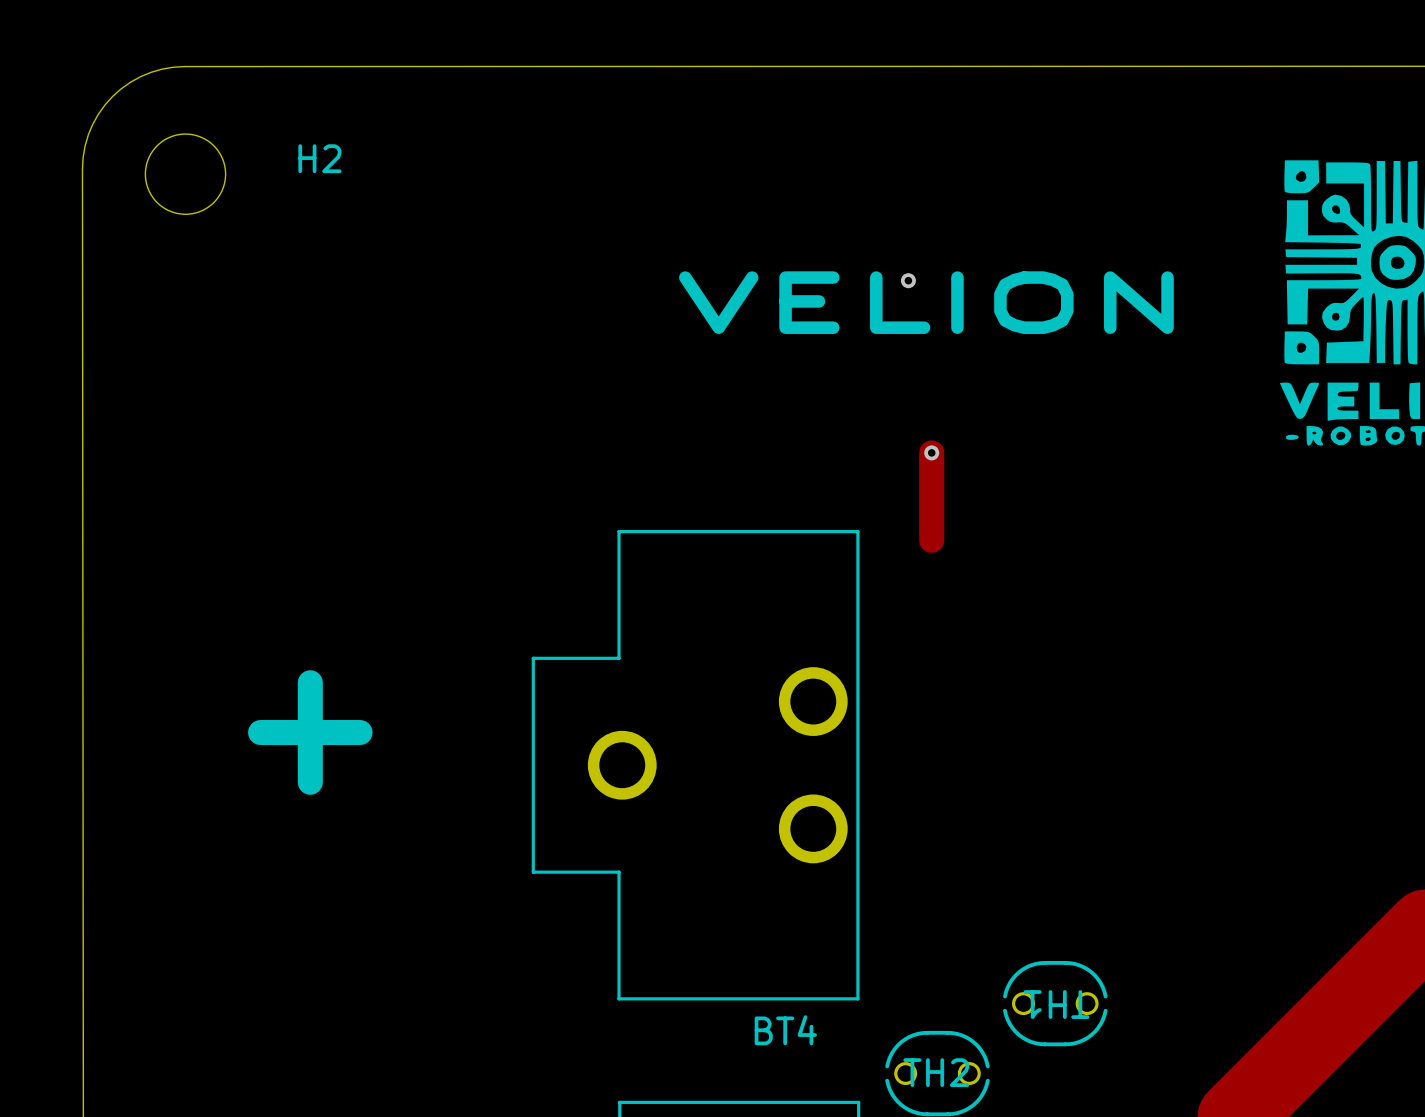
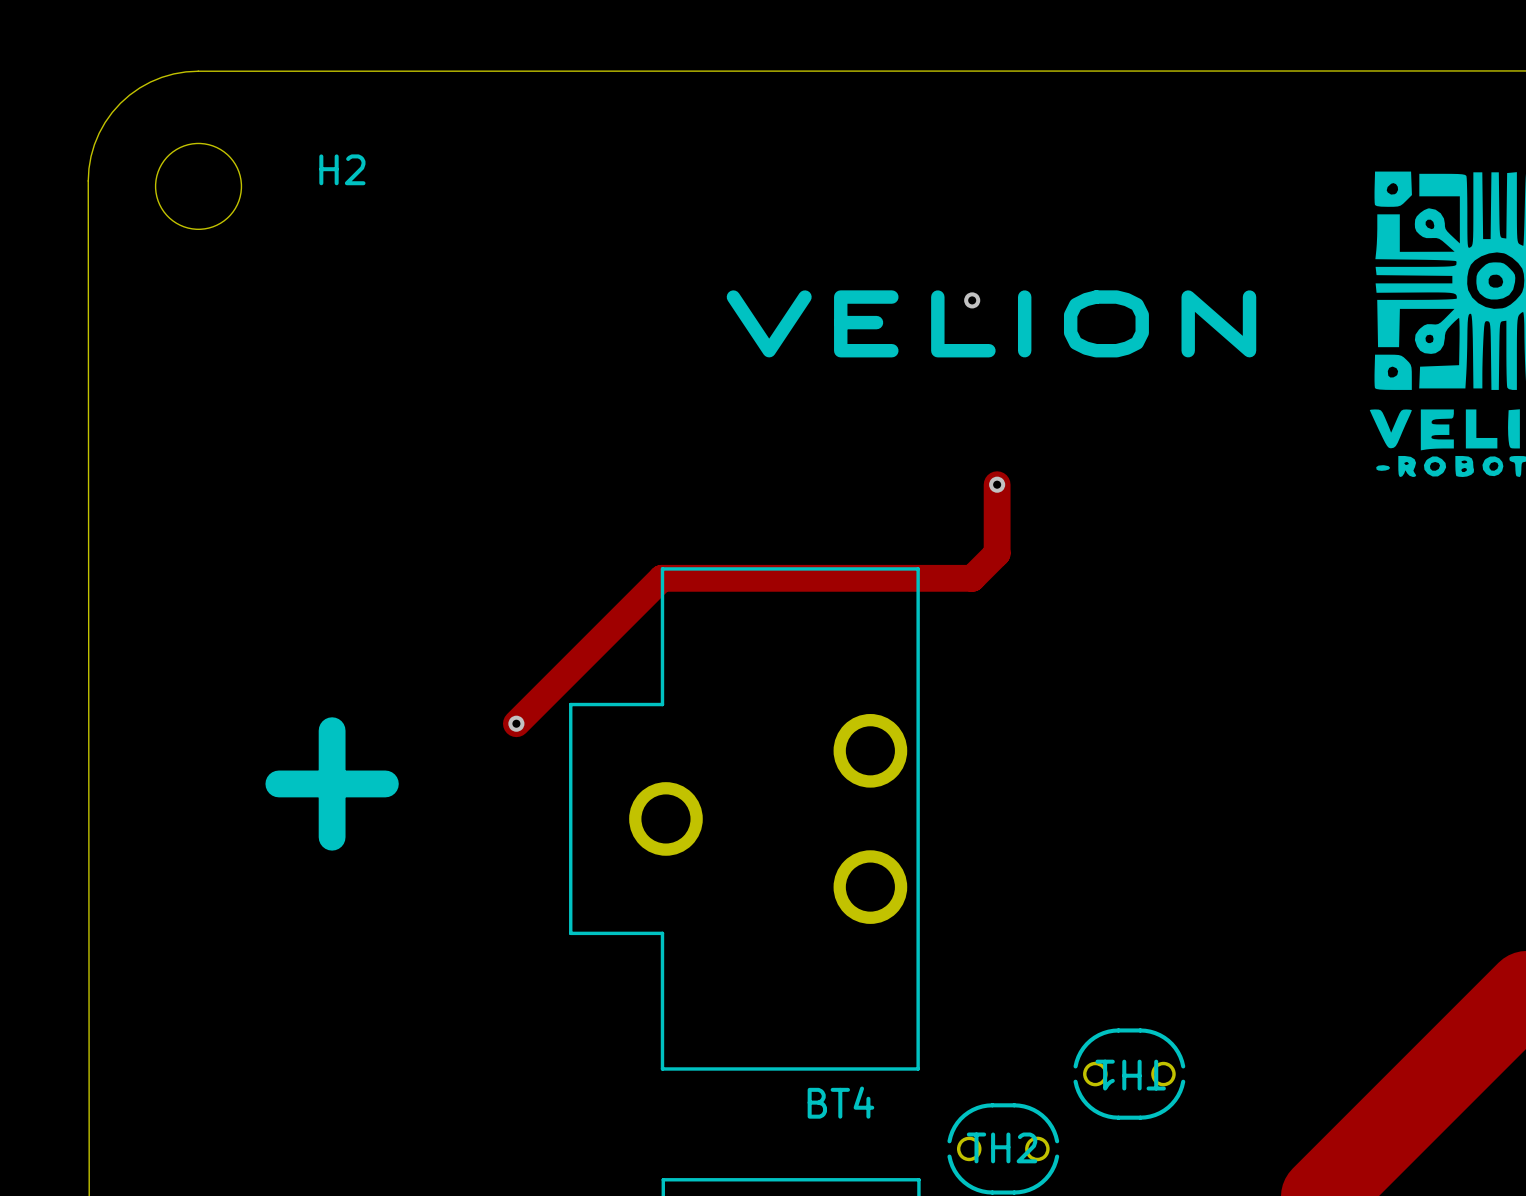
track: (931, 517) (932, 540) -> (997, 553) (972, 578) (661, 578) (516, 723)
via: none -> (516, 723)

